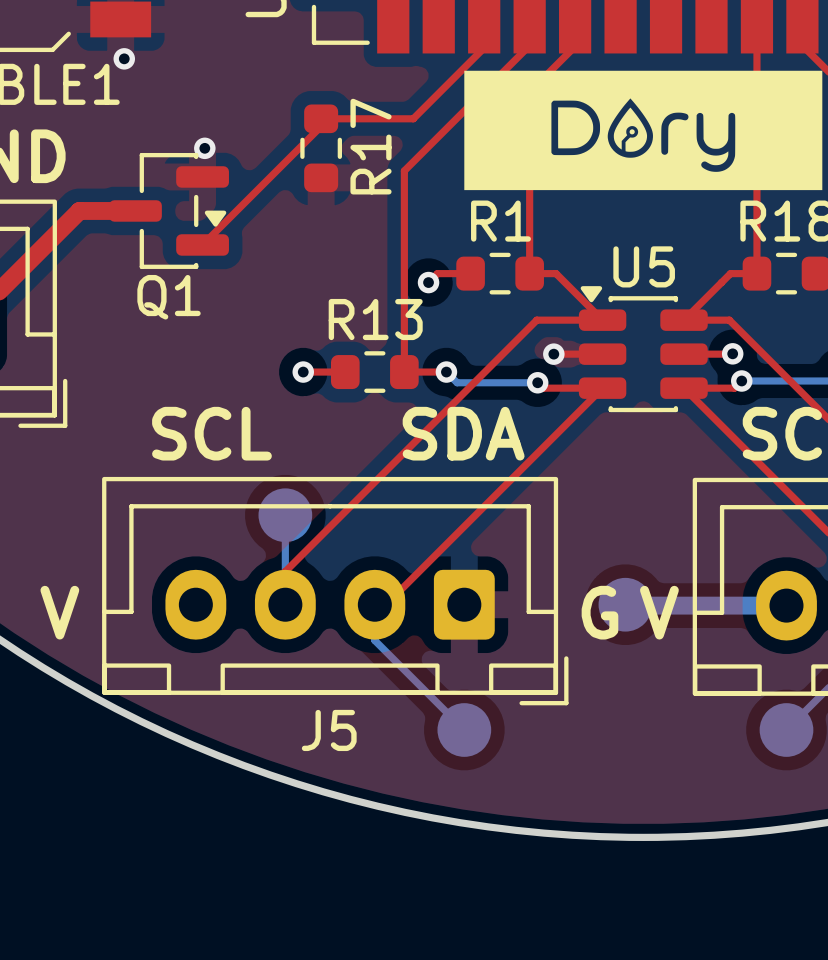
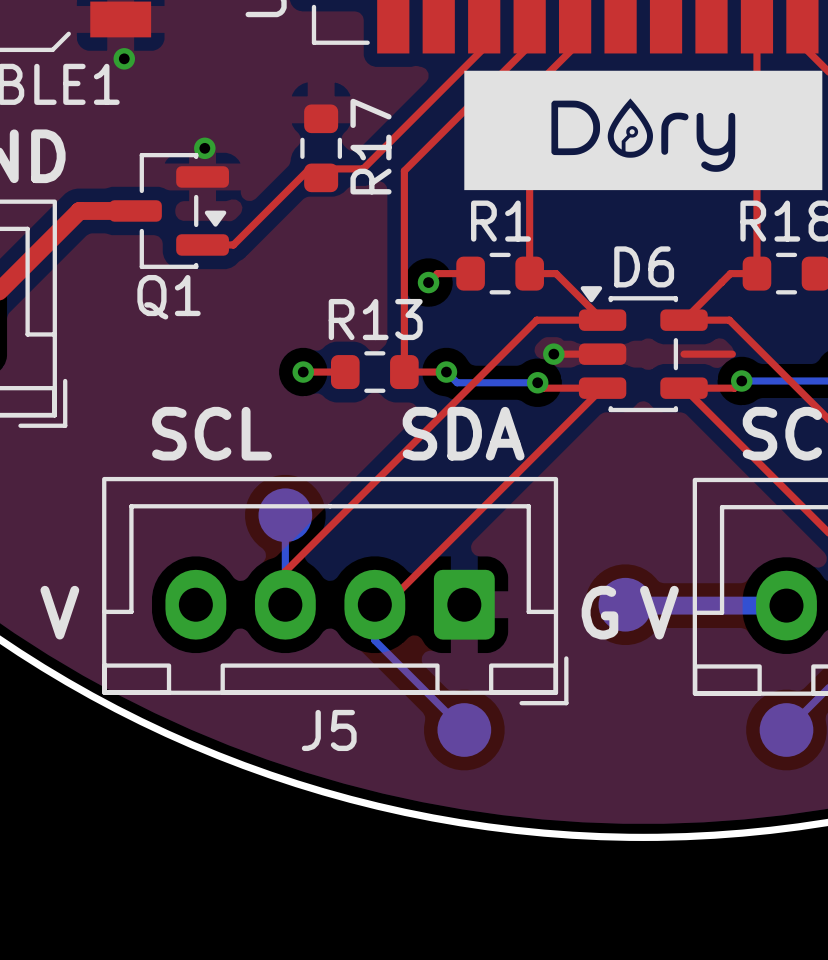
top track: (413, 118) (321, 118) (321, 126) (202, 244) -> (413, 118) (363, 168) (309, 168) (233, 244) (202, 244)
U5: (643, 349) -> none
D6: none -> (643, 349)
via: (732, 353) -> none

